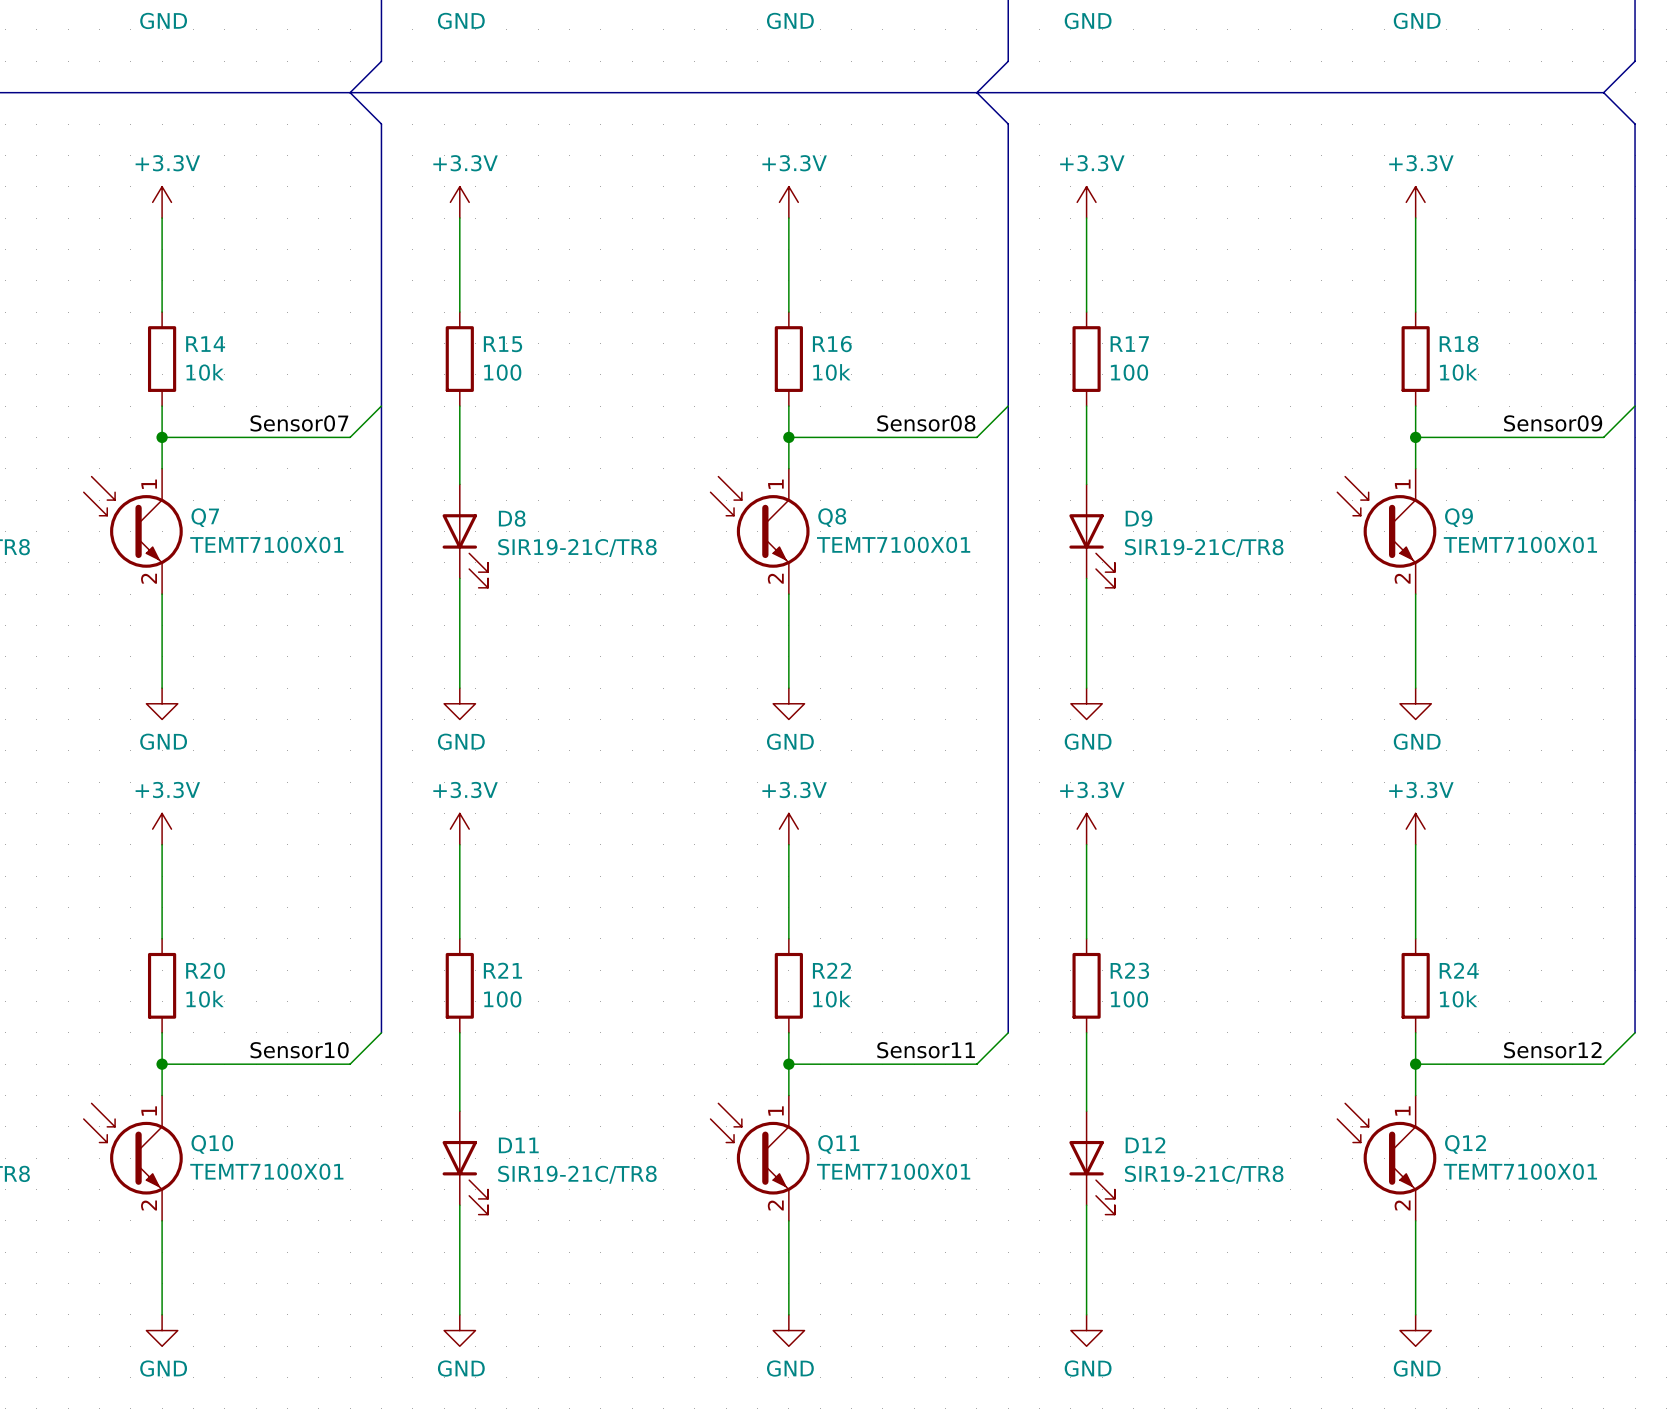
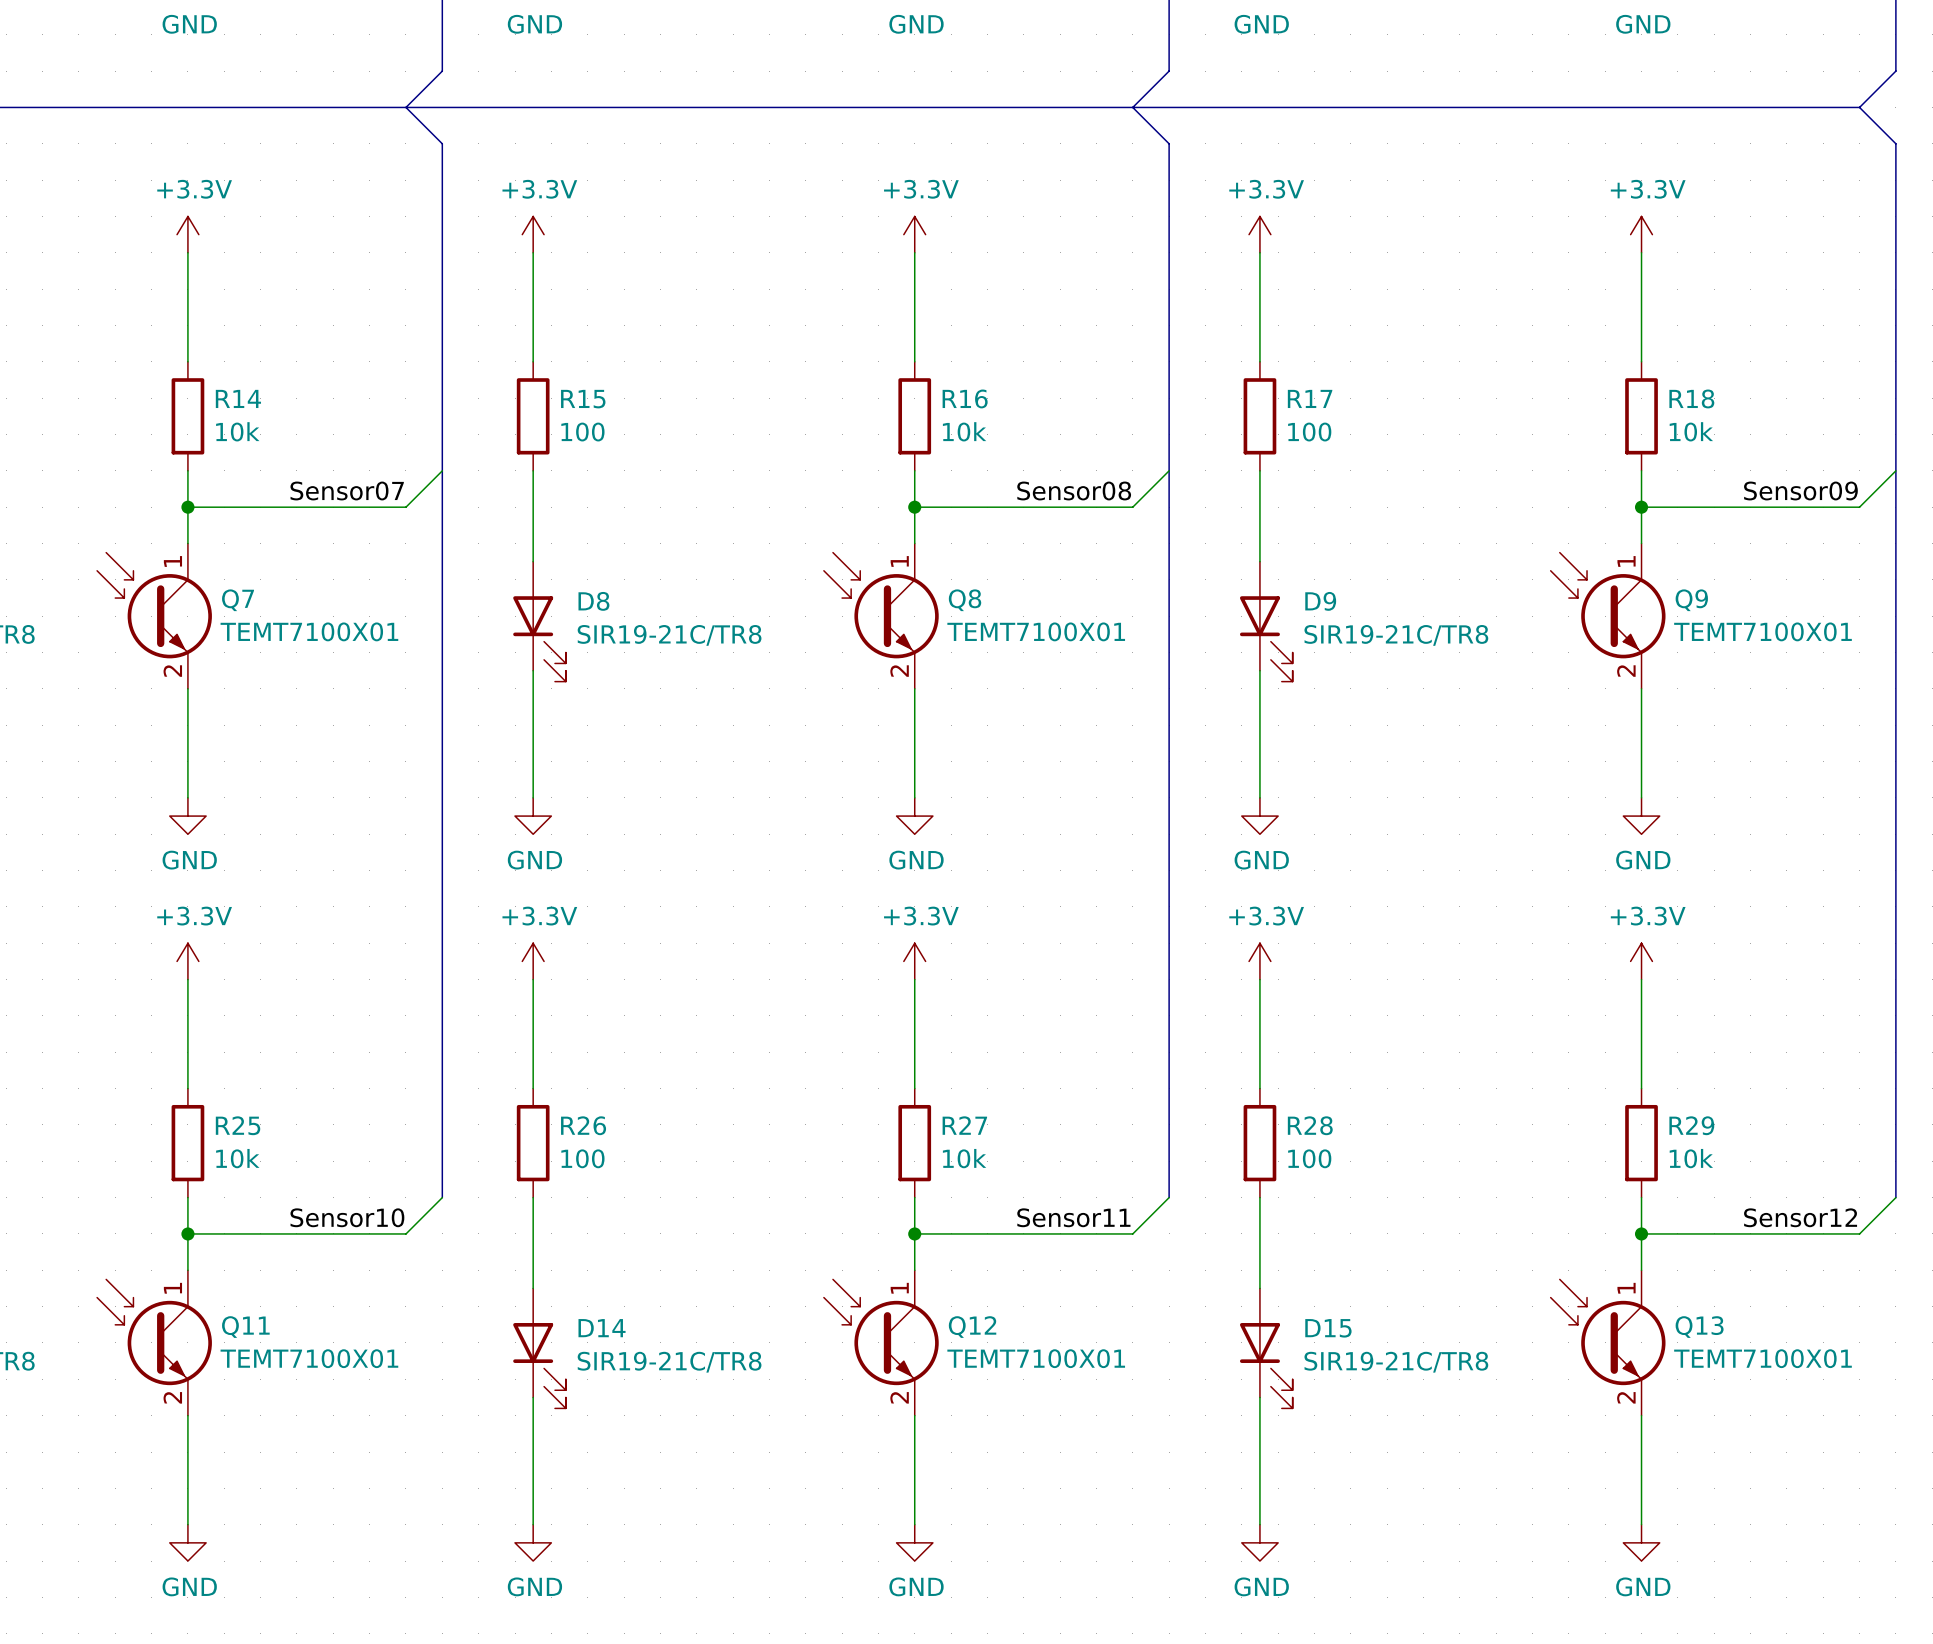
R20 name: R20 (205, 970) -> R25 (238, 1125)
R21 name: R21 (502, 970) -> R26 (583, 1125)
R22 name: R22 (831, 970) -> R27 (964, 1125)
R23 name: R23 (1129, 970) -> R28 (1310, 1125)
R24 name: R24 (1459, 970) -> R29 (1691, 1125)
Q10 name: Q10 (212, 1144) -> Q11 (245, 1327)
Q11 name: Q11 (838, 1144) -> Q12 (972, 1327)
Q12 name: Q12 (1465, 1144) -> Q13 (1699, 1327)
D11 name: D11 (518, 1145) -> D14 (602, 1328)
D12 name: D12 (1145, 1145) -> D15 (1328, 1328)

